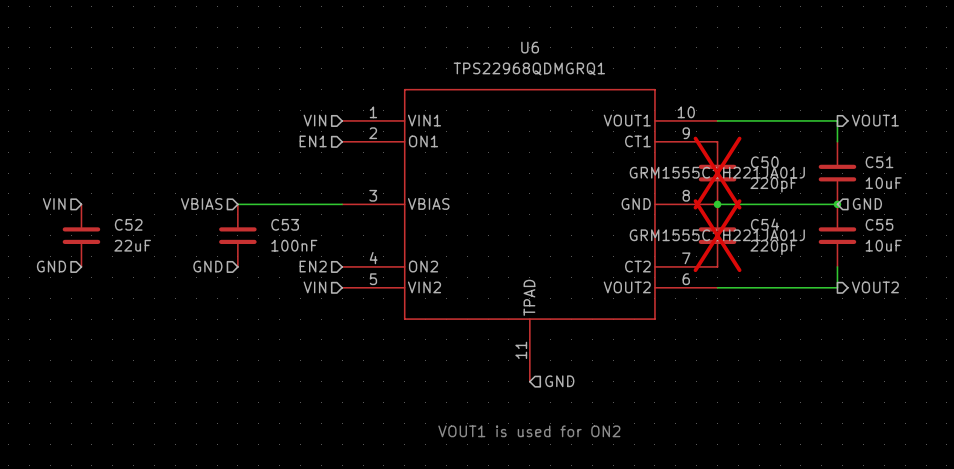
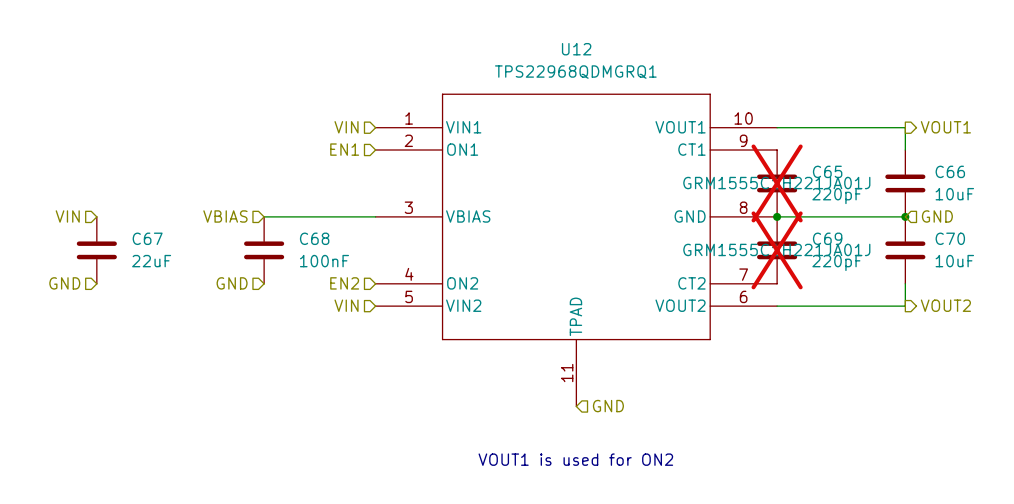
U6 name: U6 (530, 47) -> U12 (576, 49)
C50 name: C50 (764, 162) -> C65 (827, 171)
C51 name: C51 (879, 162) -> C66 (950, 171)
C52 name: C52 (128, 224) -> C67 (147, 238)
C53 name: C53 (285, 224) -> C68 (314, 238)
C54 name: C54 (765, 224) -> C69 (827, 238)
C55 name: C55 (879, 224) -> C70 (950, 238)

